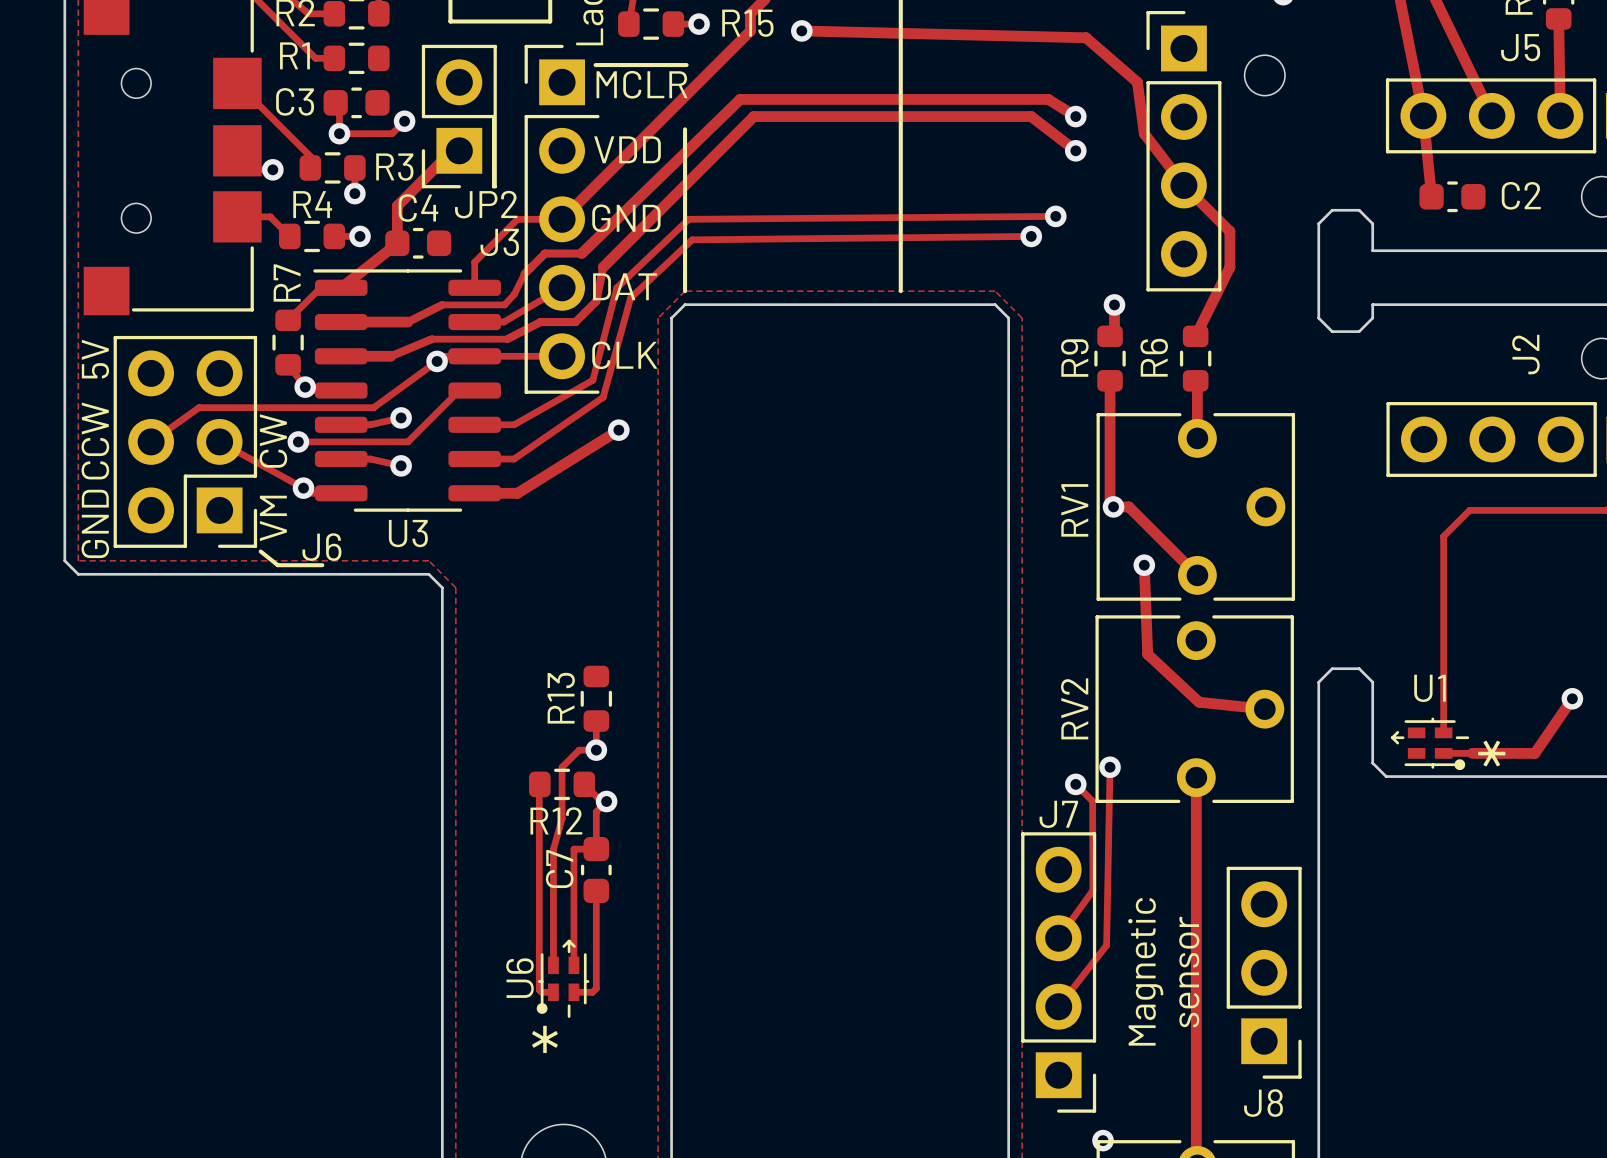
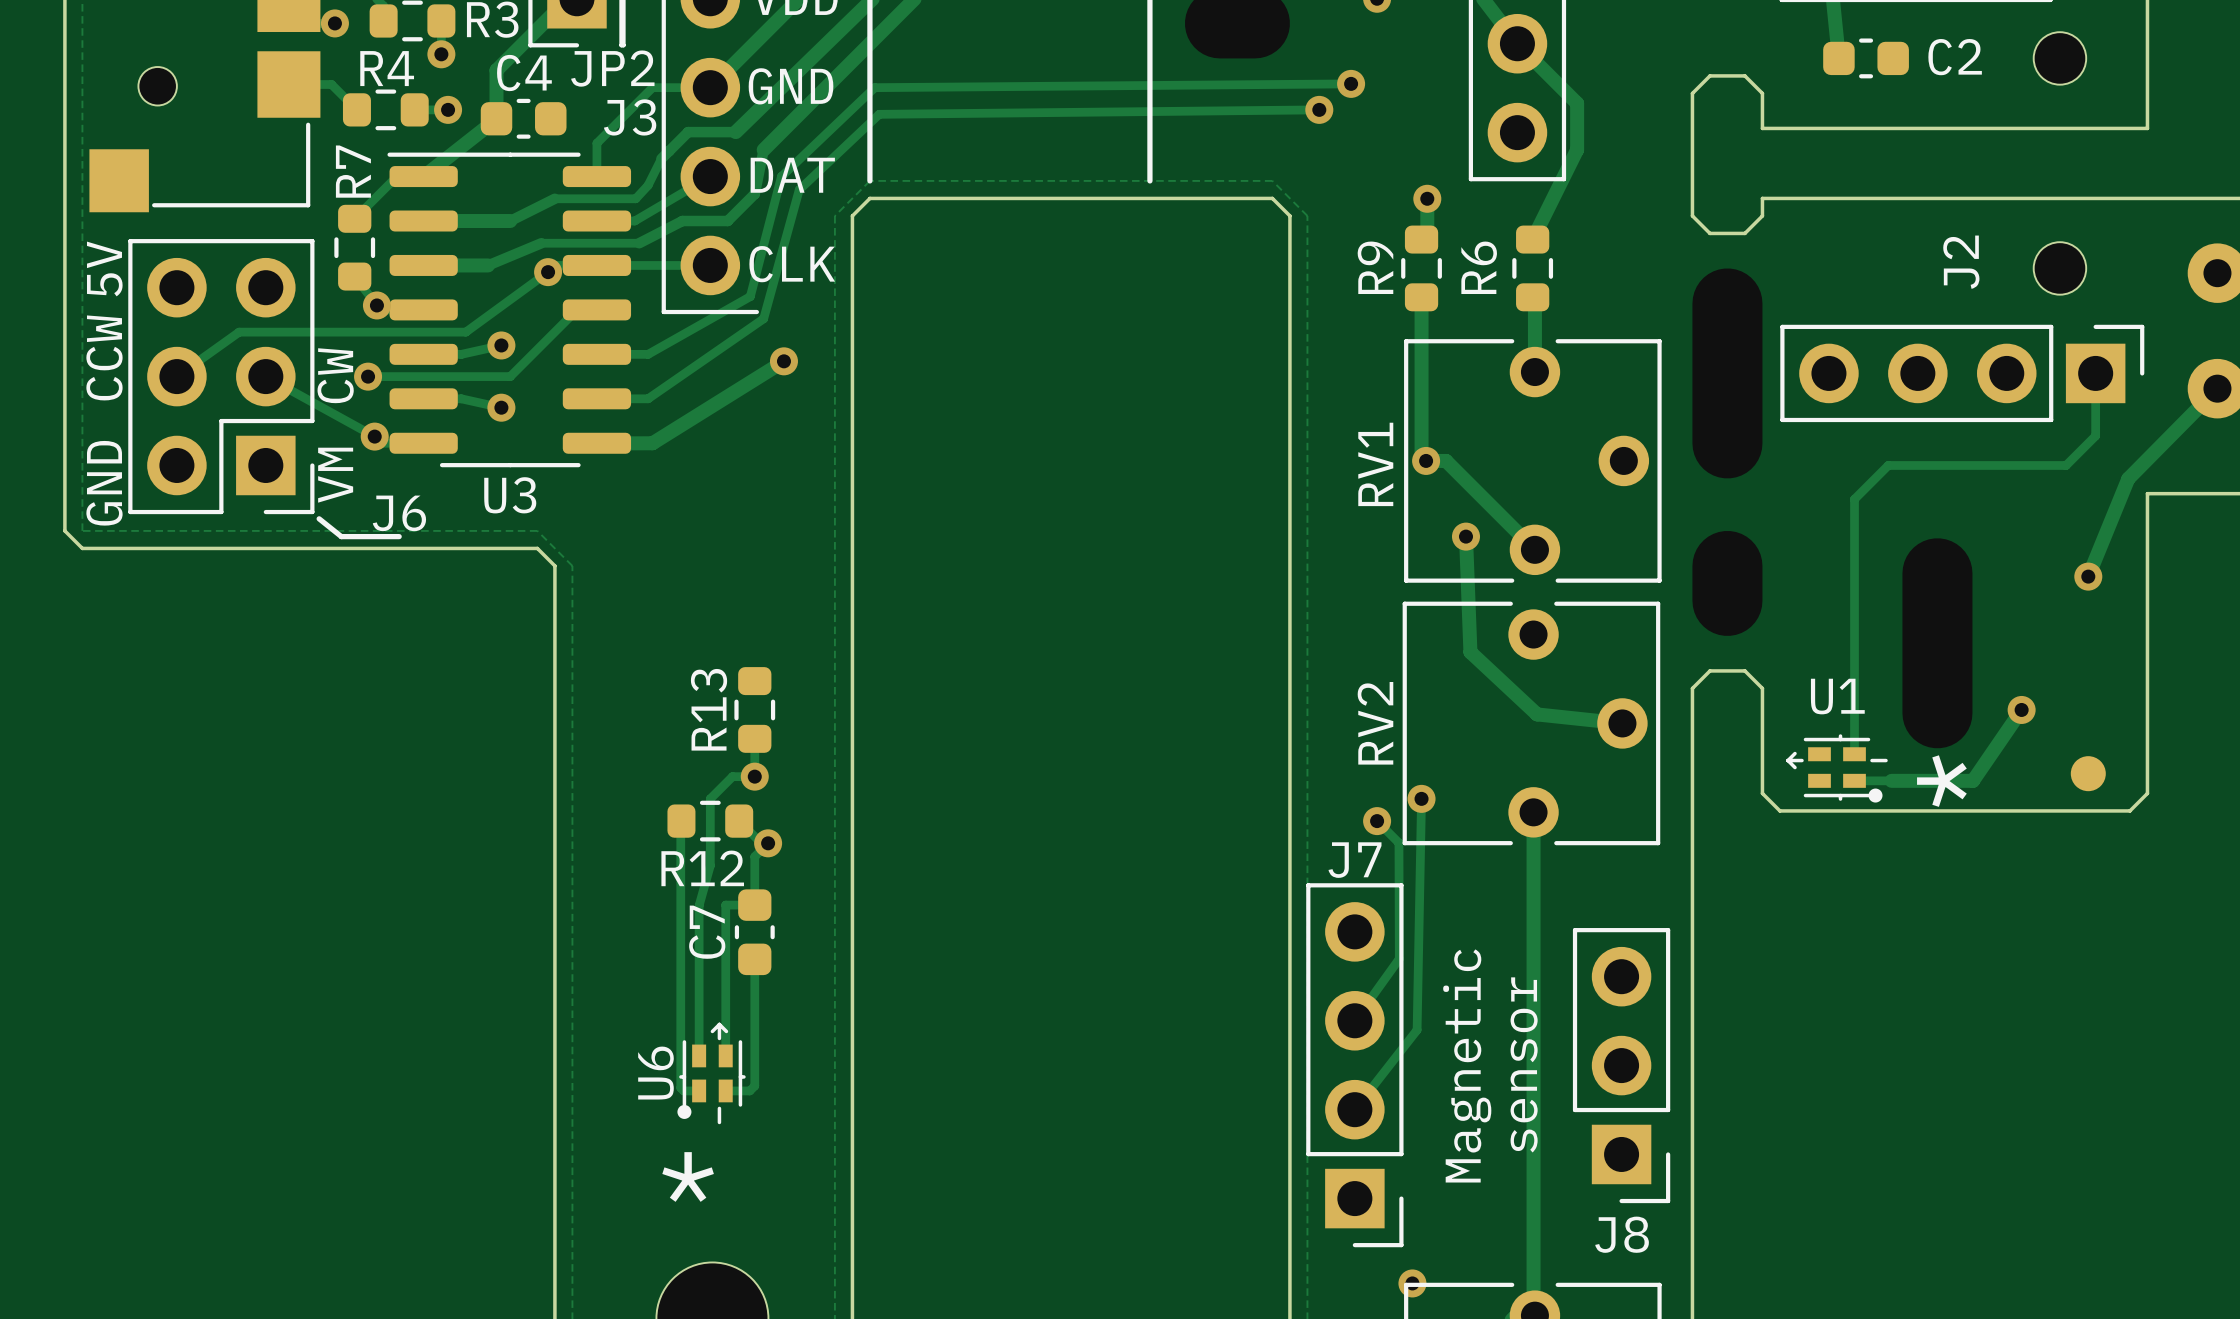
text position: CCW (95, 441) -> CCW (104, 357)

